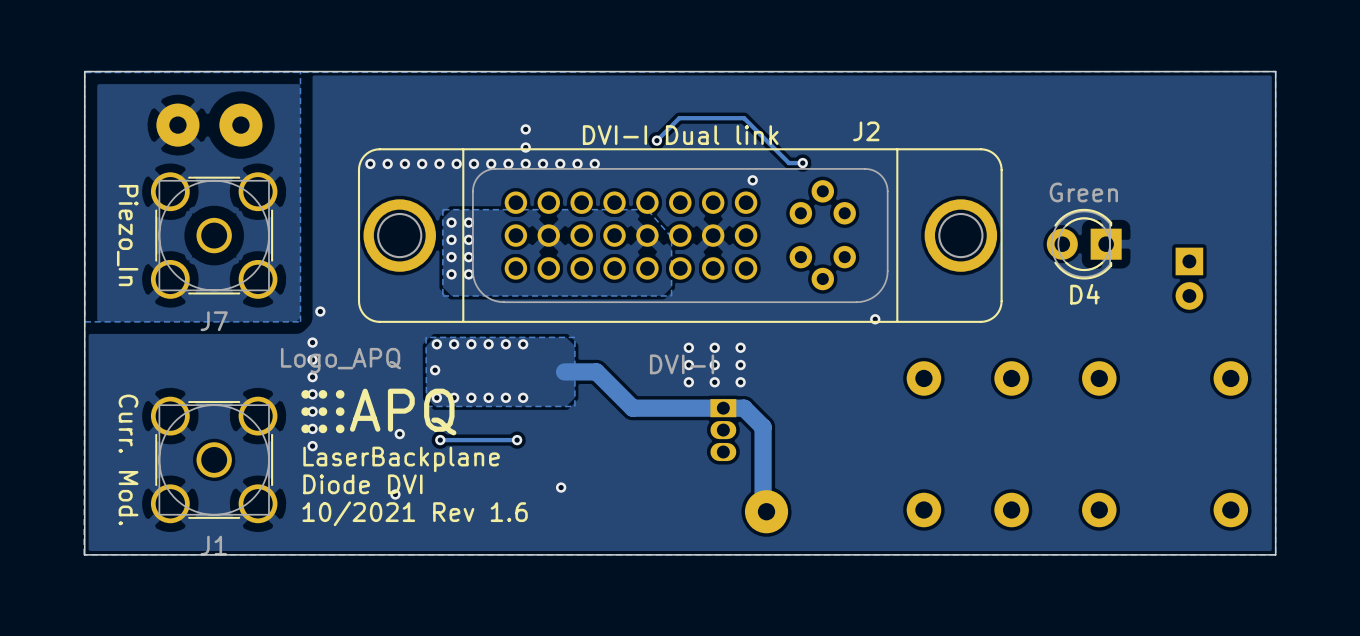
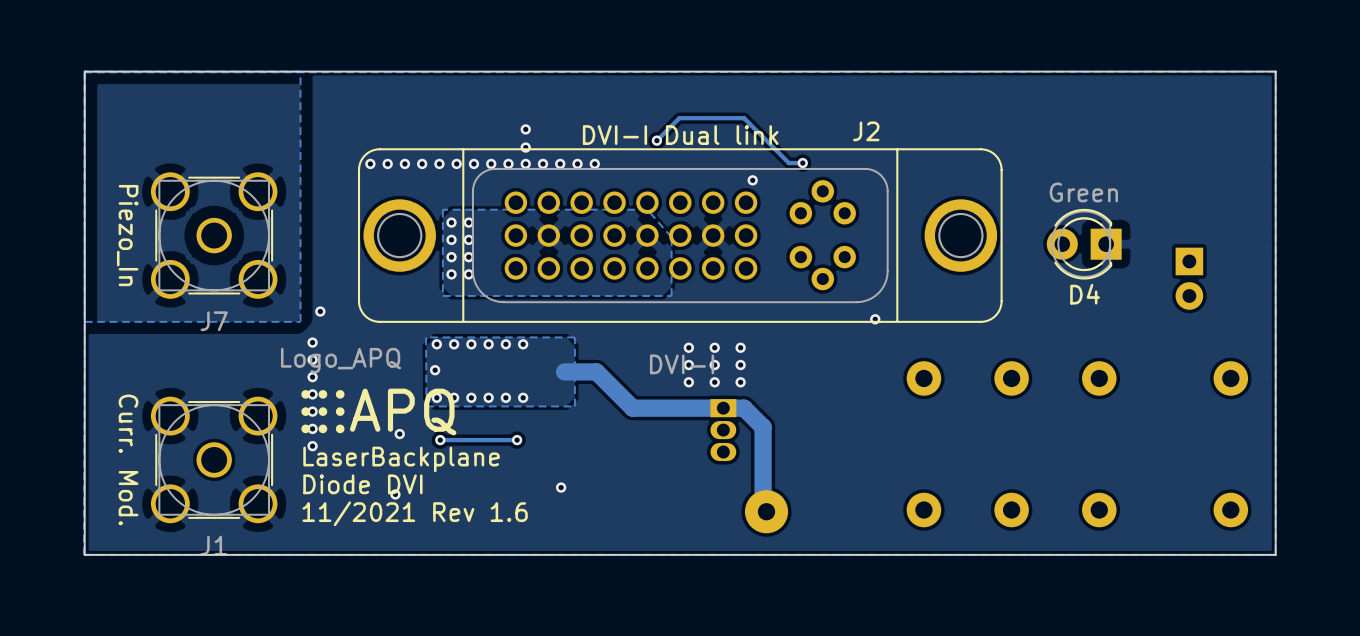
part: (177, 125) -> none
part: (240, 125) -> none
text: 10/2021 Rev 1.6 (415, 513) -> 11/2021 Rev 1.6 (415, 513)

